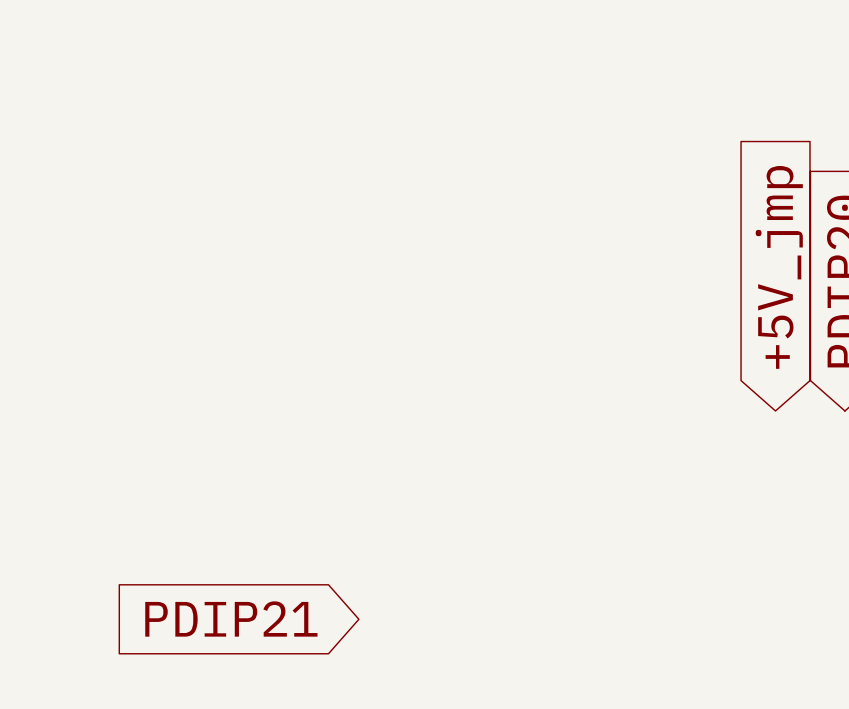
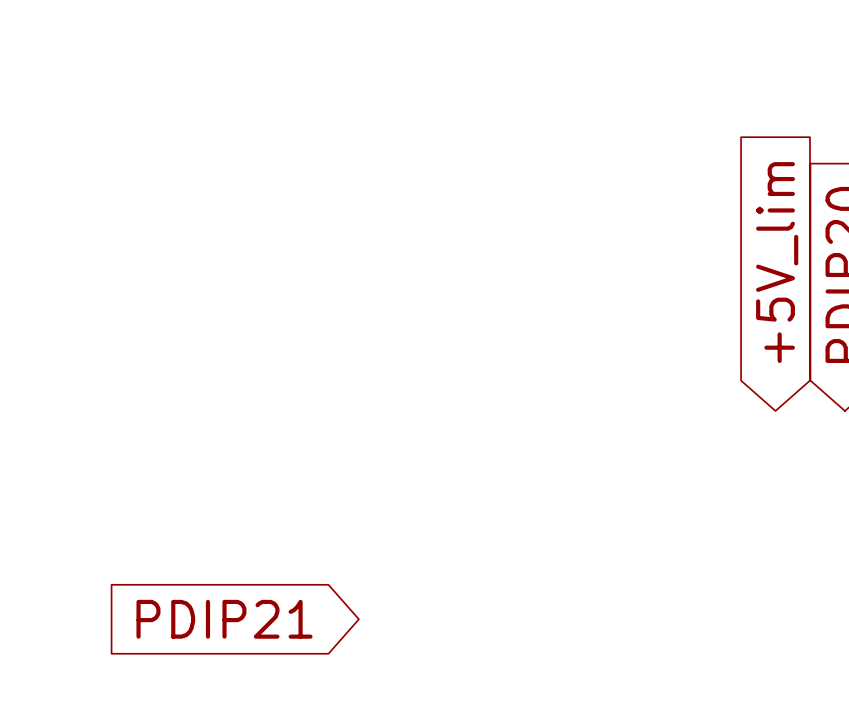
global label: +5V_jmp (779, 267) -> +5V_lim (777, 262)

